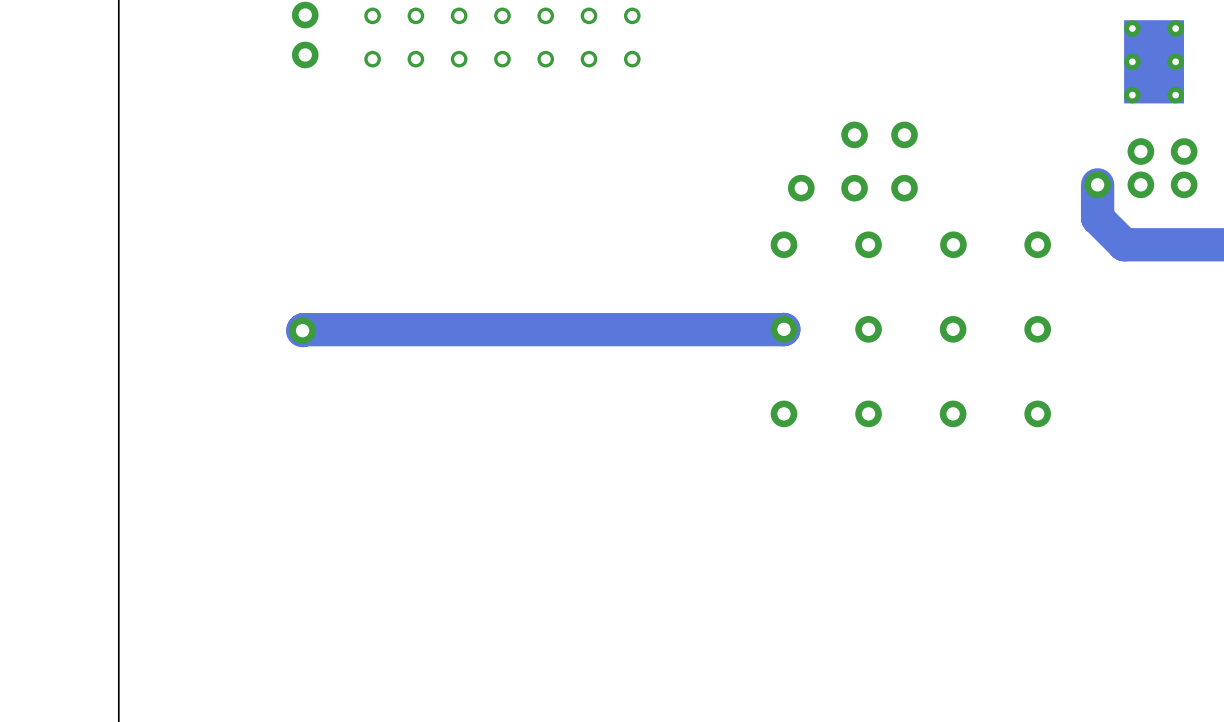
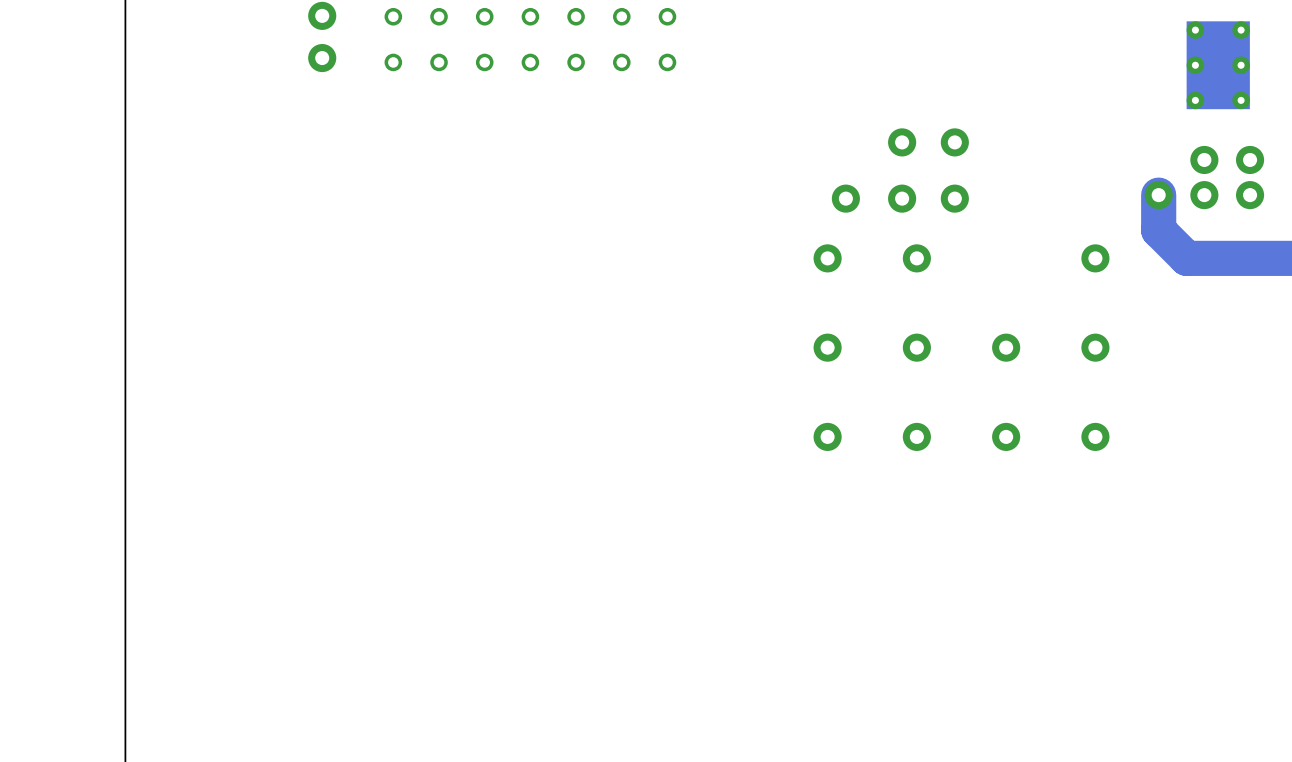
via: (953, 244) -> none
track: (783, 329) (302, 330) -> none
via: (302, 330) -> none

